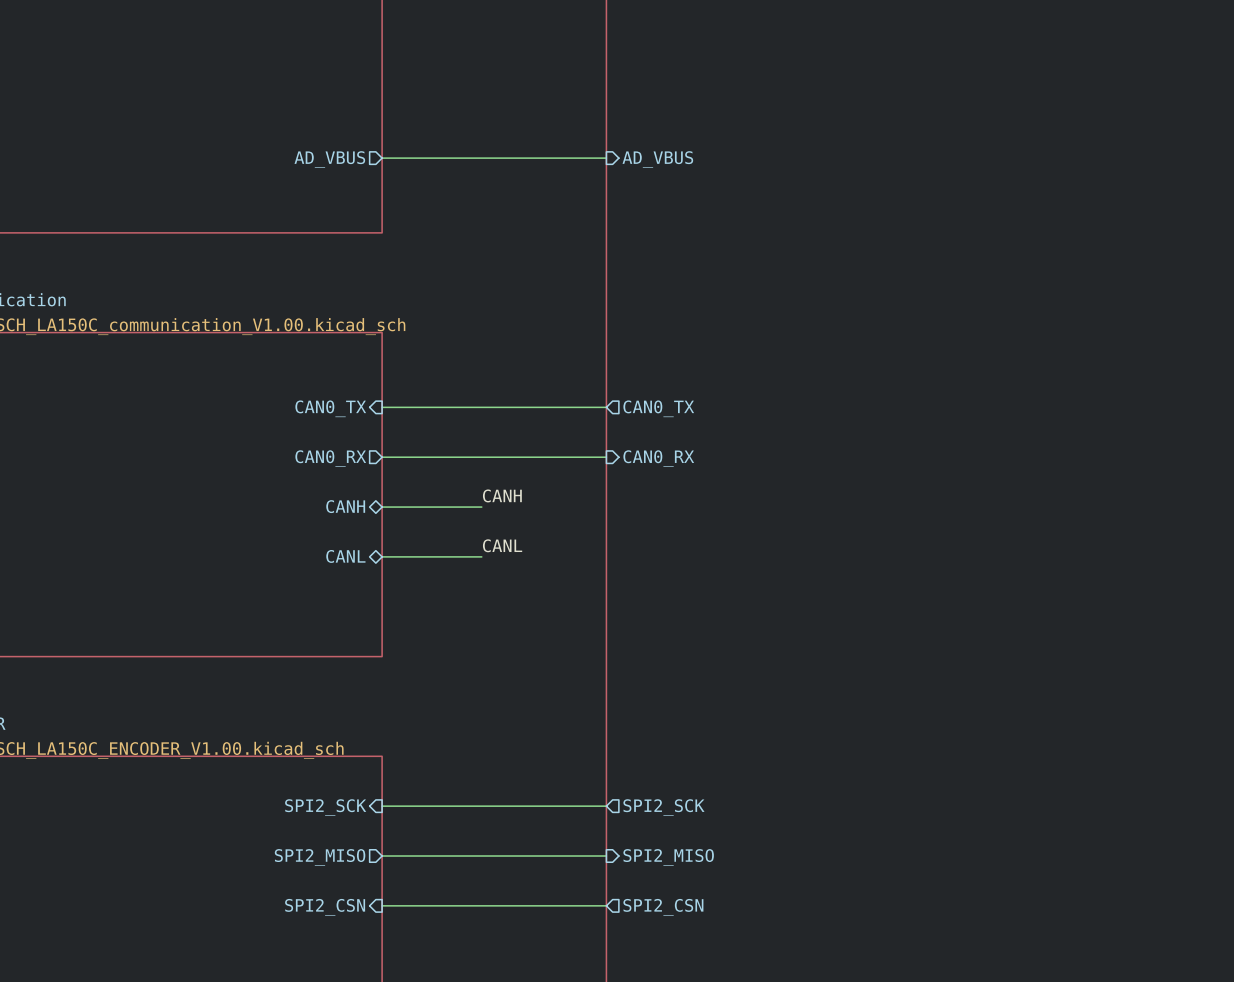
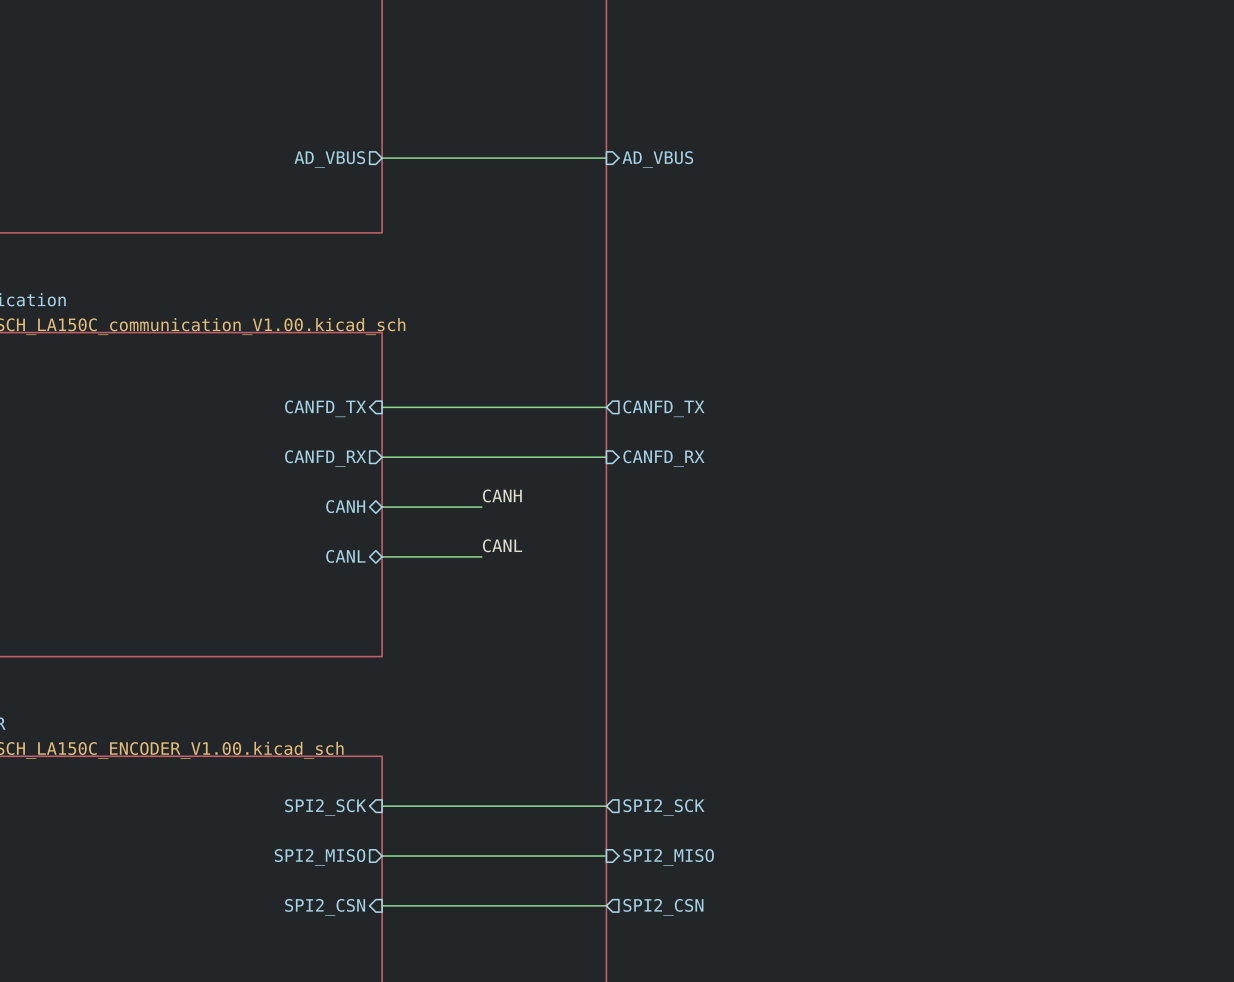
sheet pin: CAN0_TX (330, 408) -> CANFD_TX (325, 408)
sheet pin: CAN0_TX (658, 408) -> CANFD_TX (663, 408)
sheet pin: CAN0_RX (330, 458) -> CANFD_RX (325, 458)
sheet pin: CAN0_RX (658, 458) -> CANFD_RX (663, 458)

